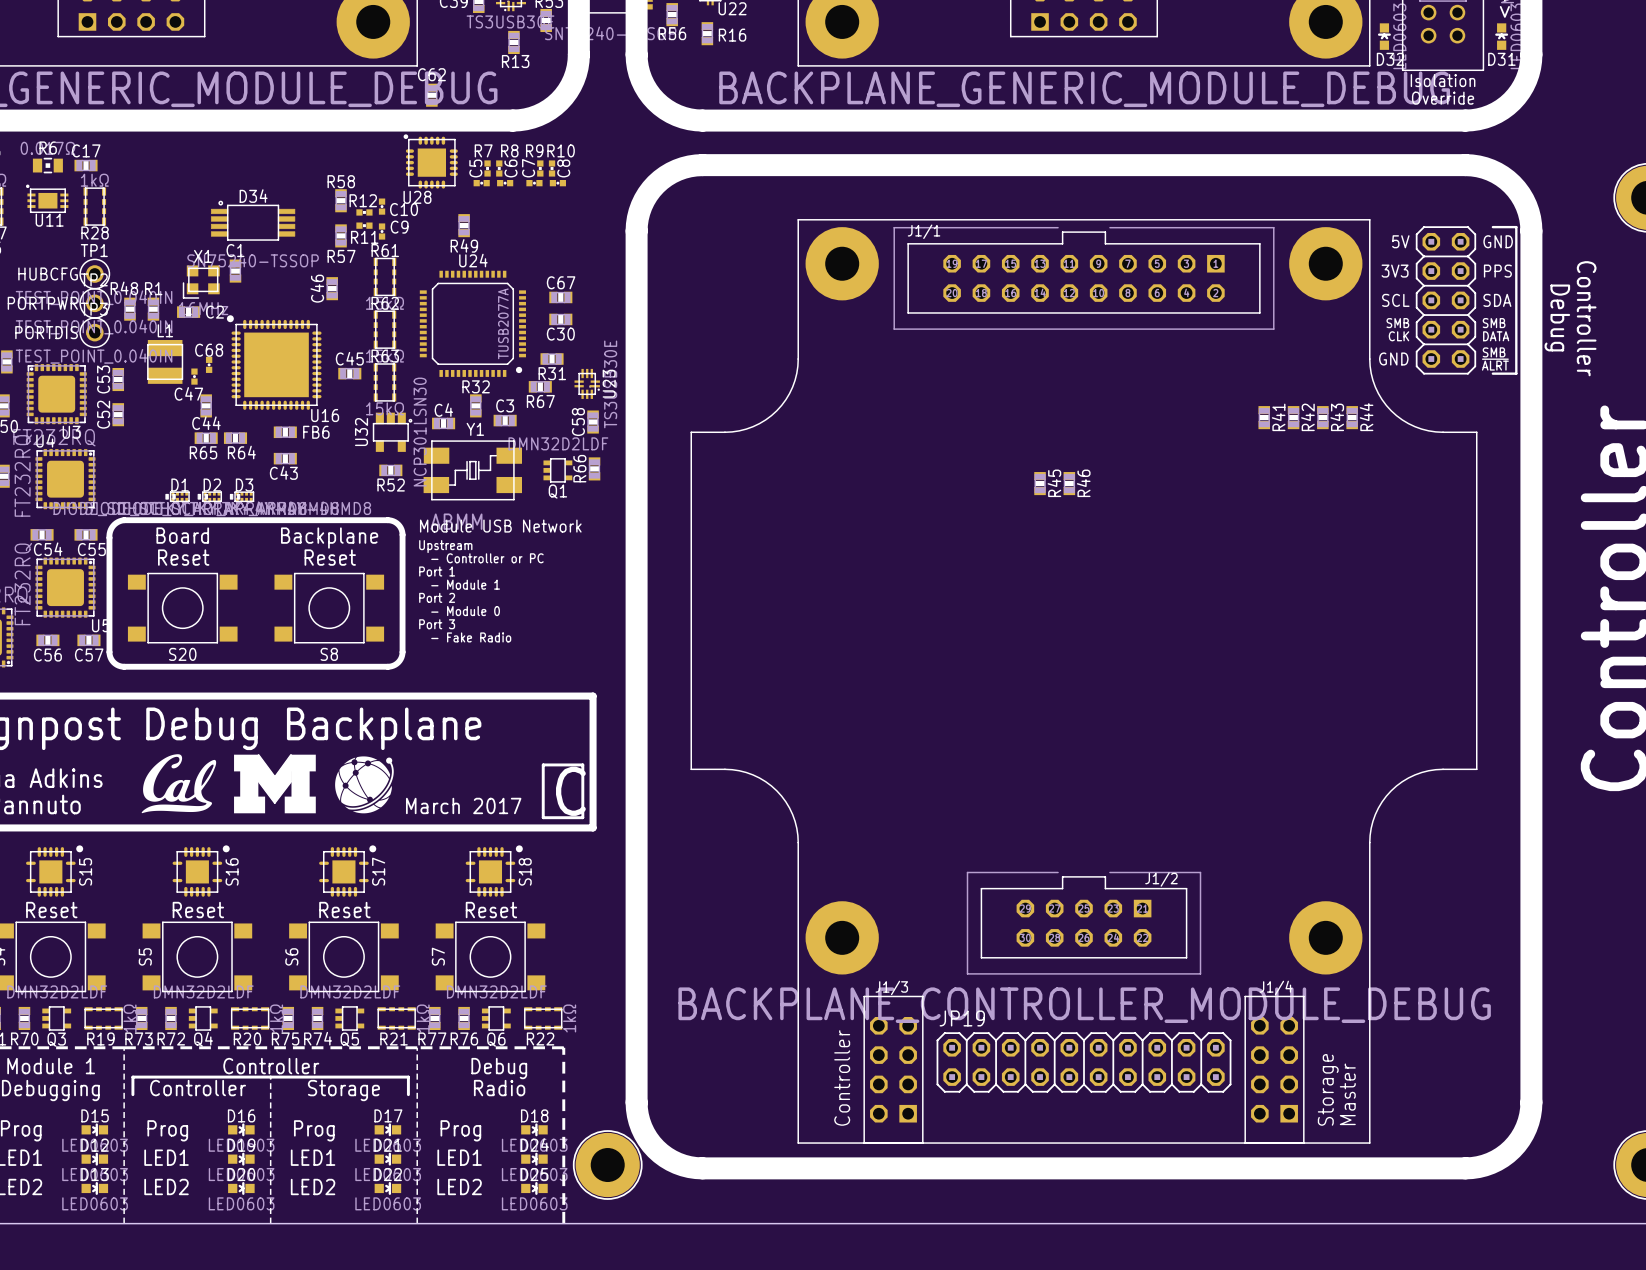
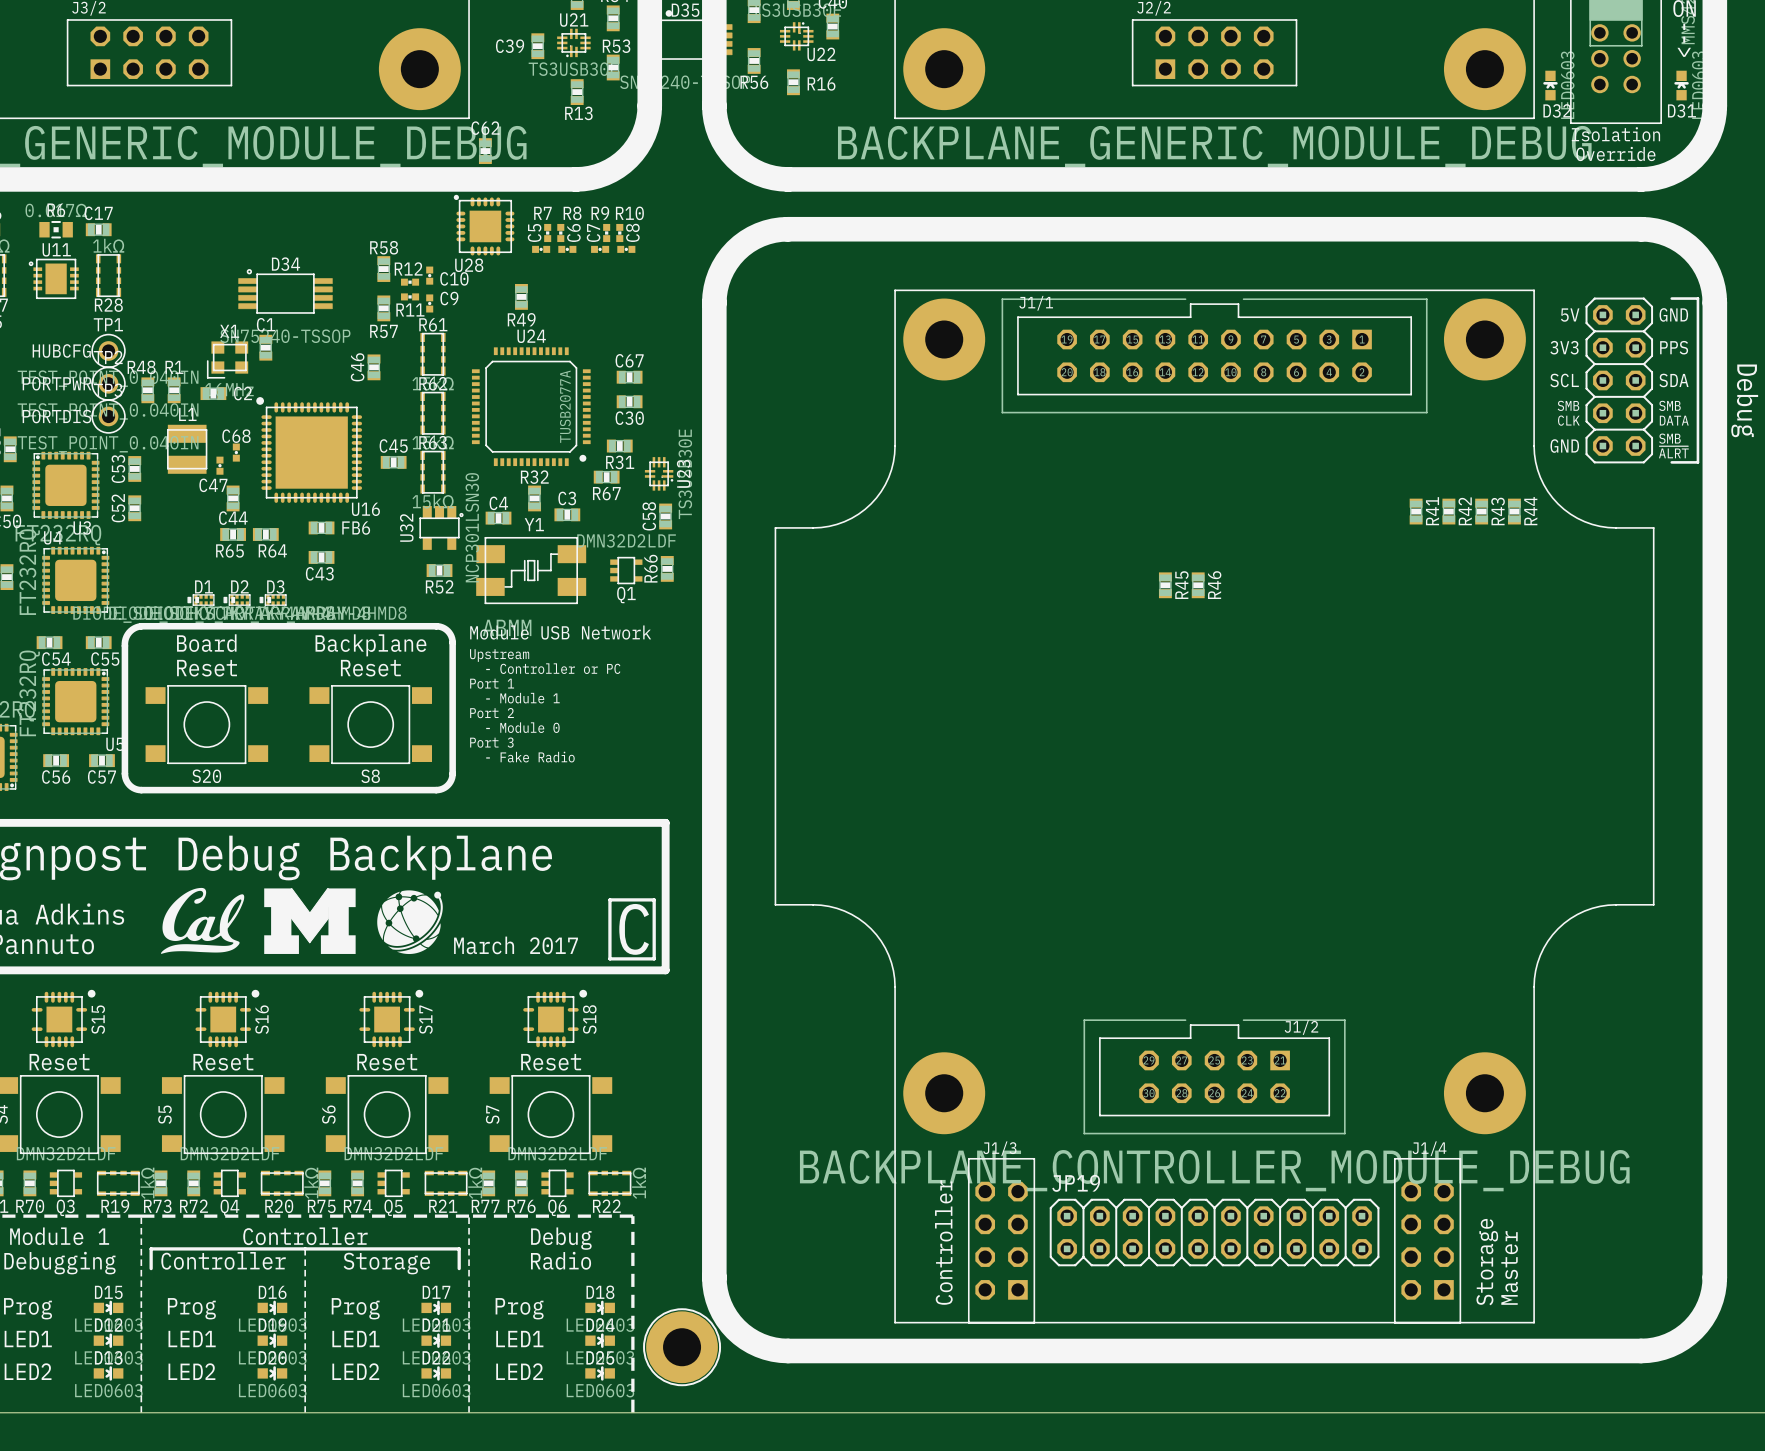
U11 footprint: [25, 184, 69, 214] -> [28, 258, 79, 300]
U11 name position: U11 (49, 220) -> U11 (56, 249)

